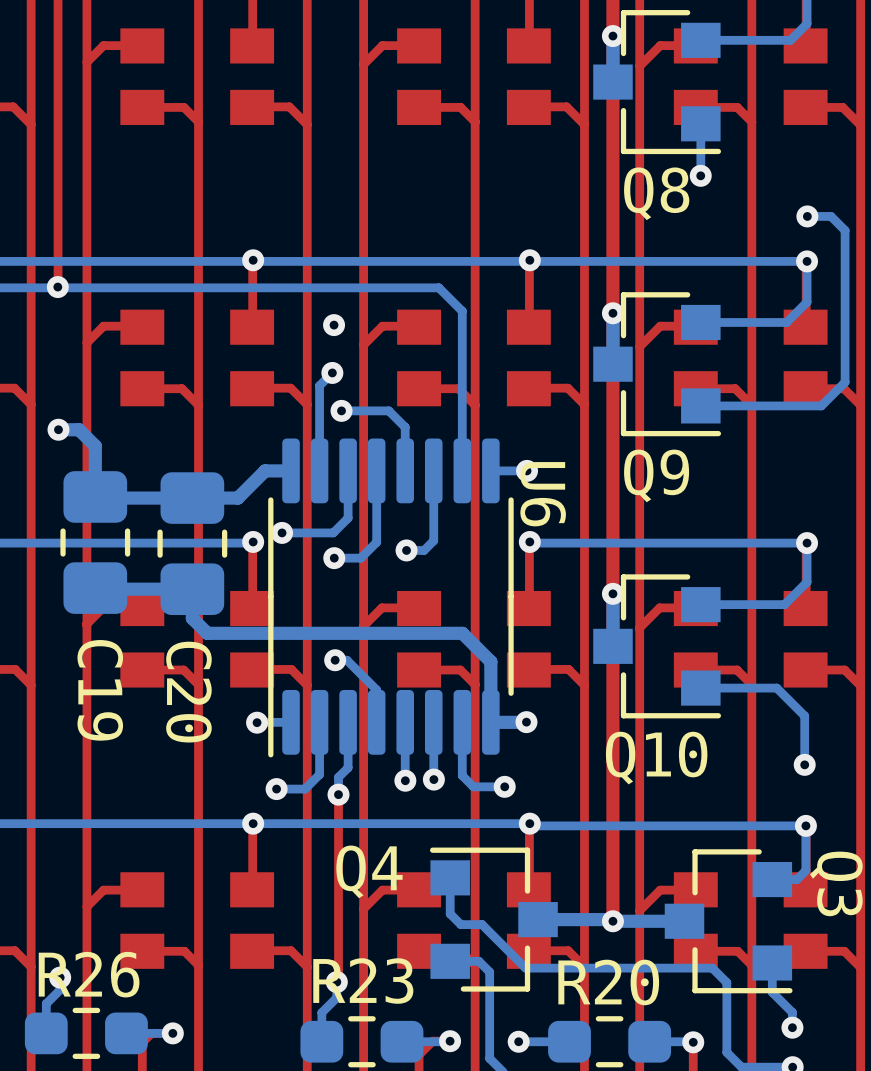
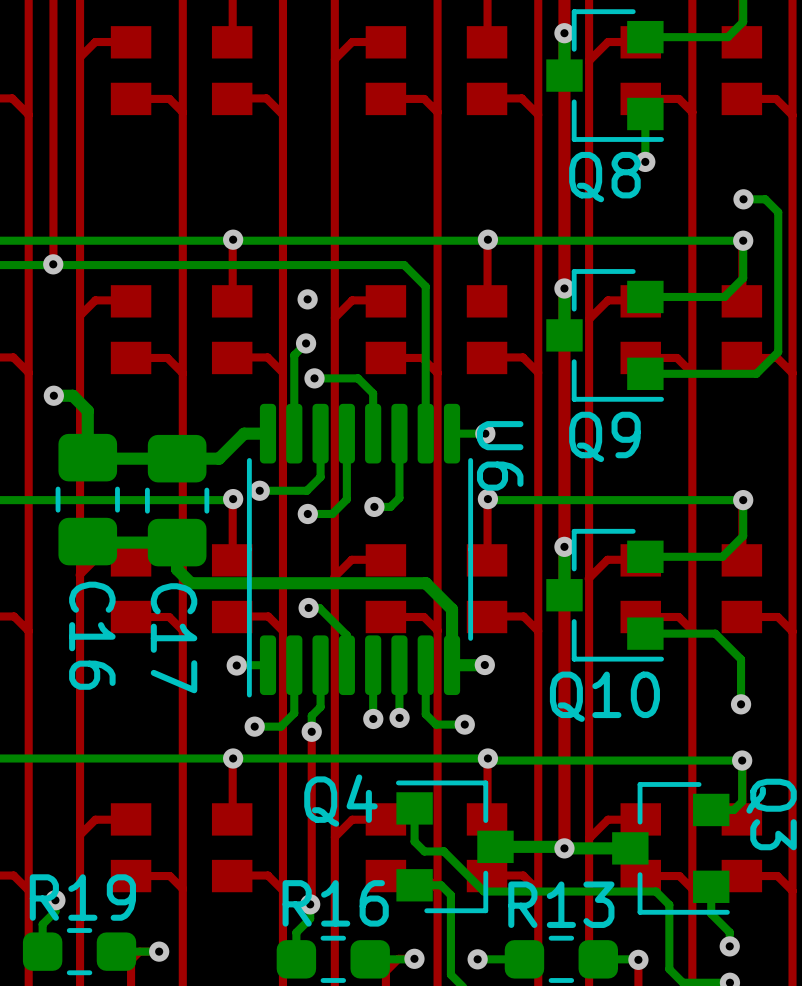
C19 name: C19 (100, 690) -> C16 (92, 635)
C20 name: C20 (188, 692) -> C17 (174, 638)
R26 name: R26 (89, 974) -> R19 (82, 897)
R23 name: R23 (363, 981) -> R16 (335, 903)
R20 name: R20 (608, 982) -> R13 (561, 904)

